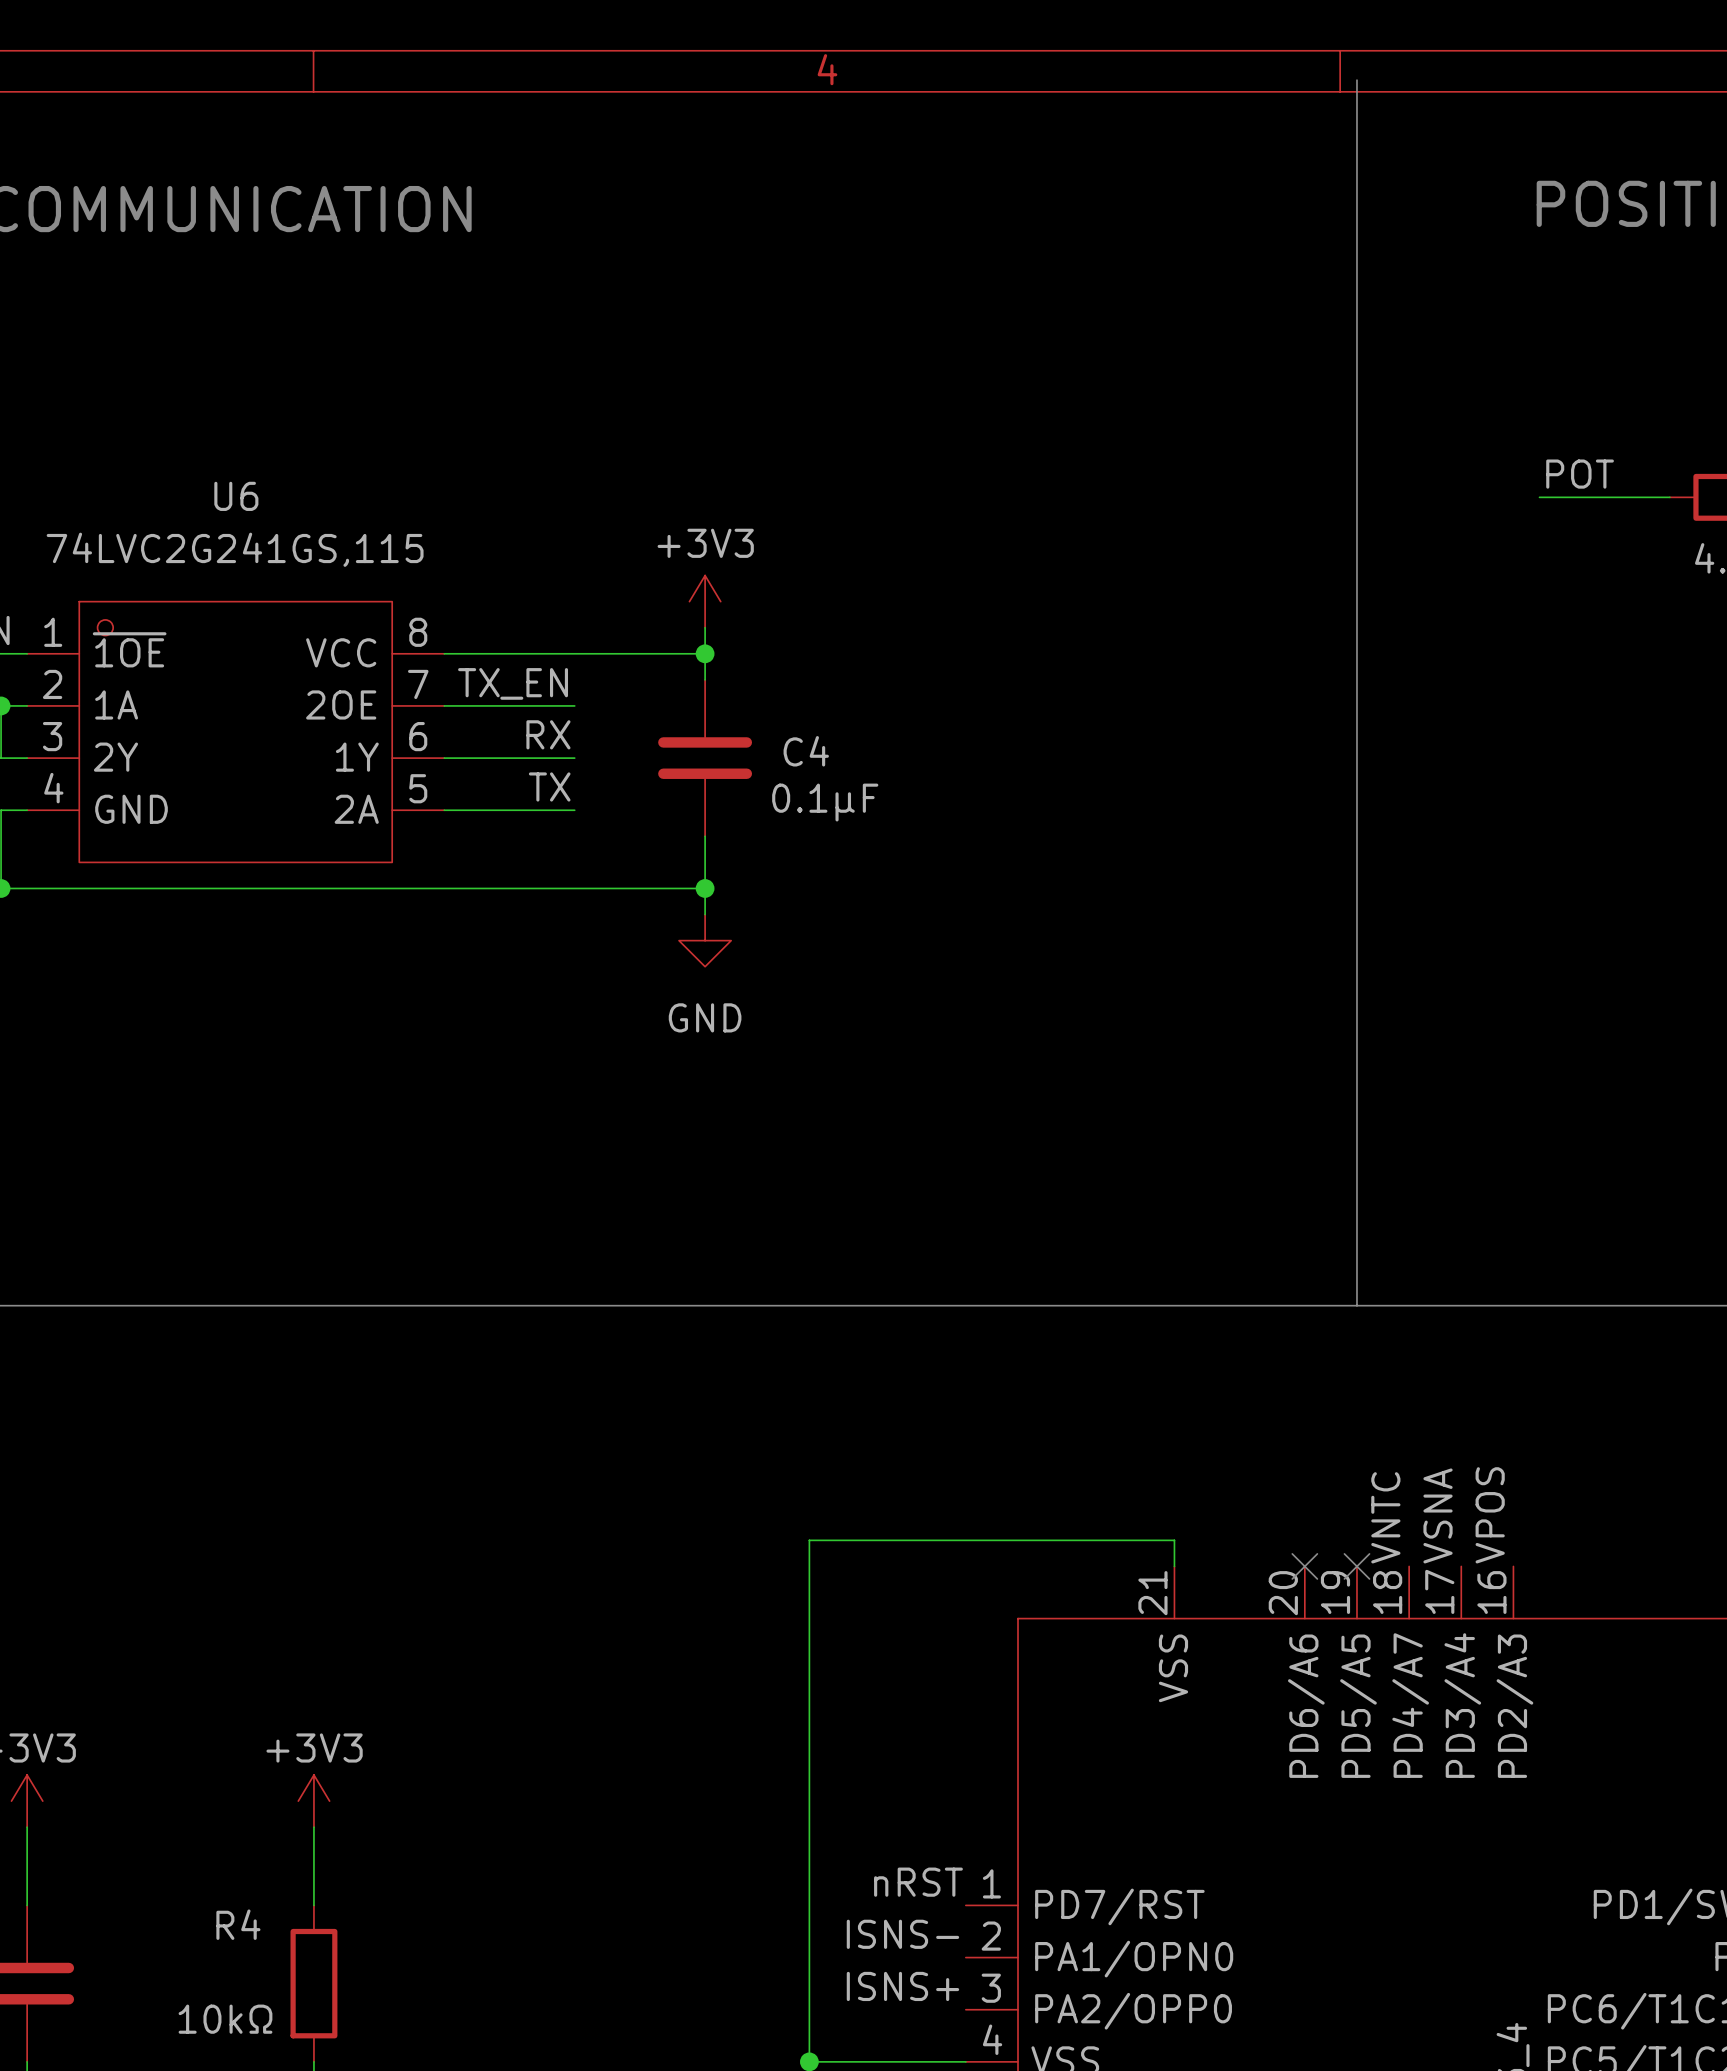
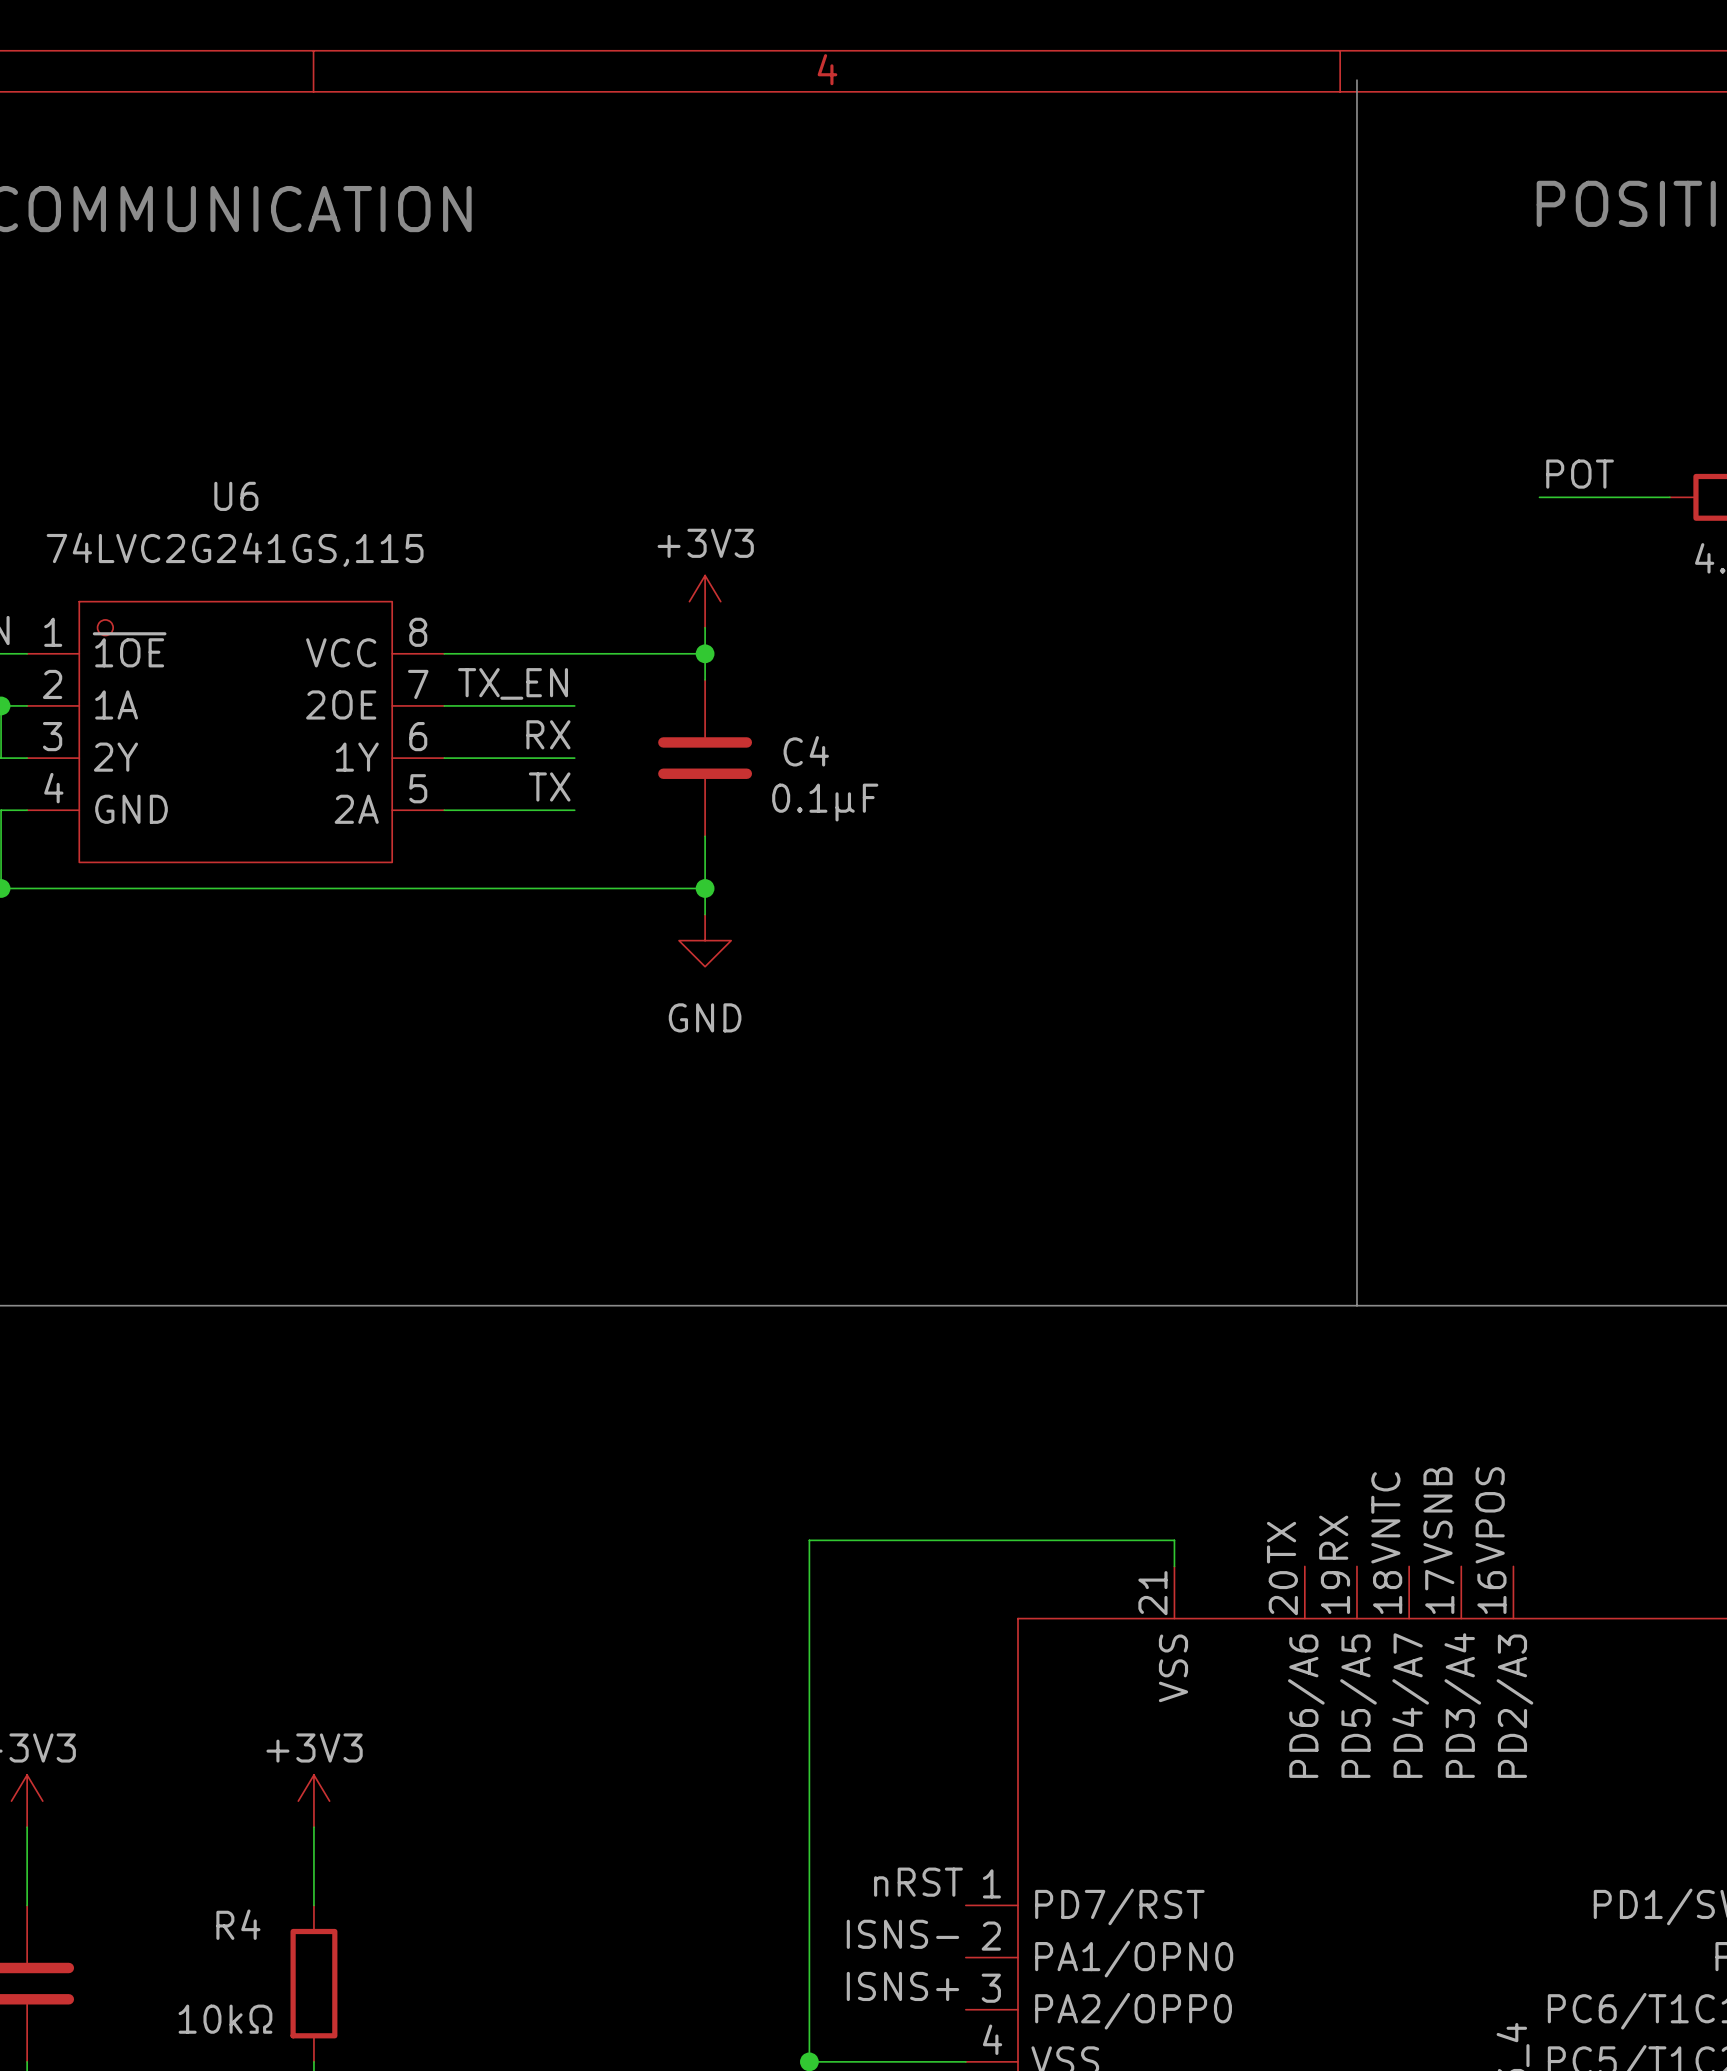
label: VSNA (1438, 1515) -> VSNB (1438, 1515)
label: none -> RX (1333, 1537)
label: none -> TX (1281, 1542)
no-connect mark: (1304, 1566) -> none
no-connect mark: (1356, 1566) -> none

